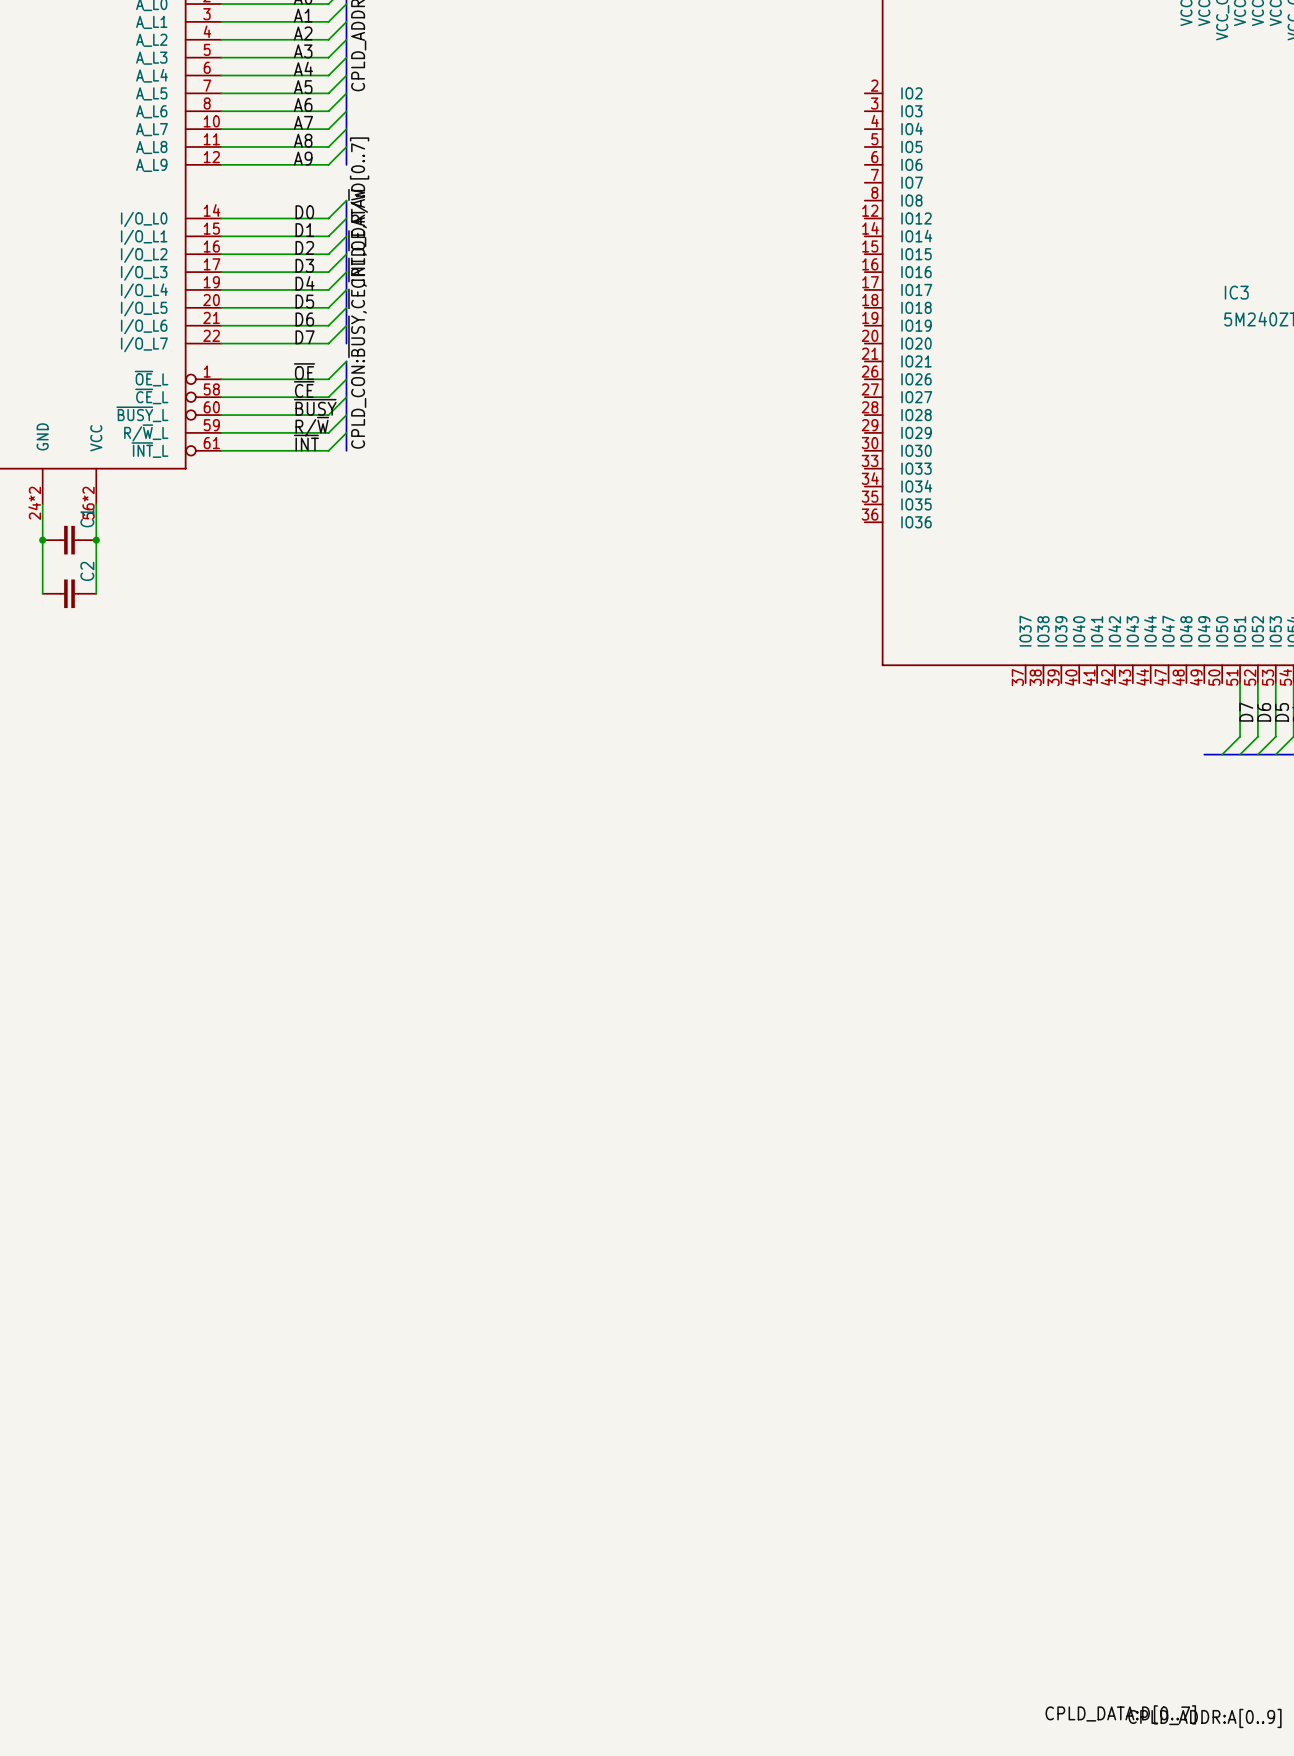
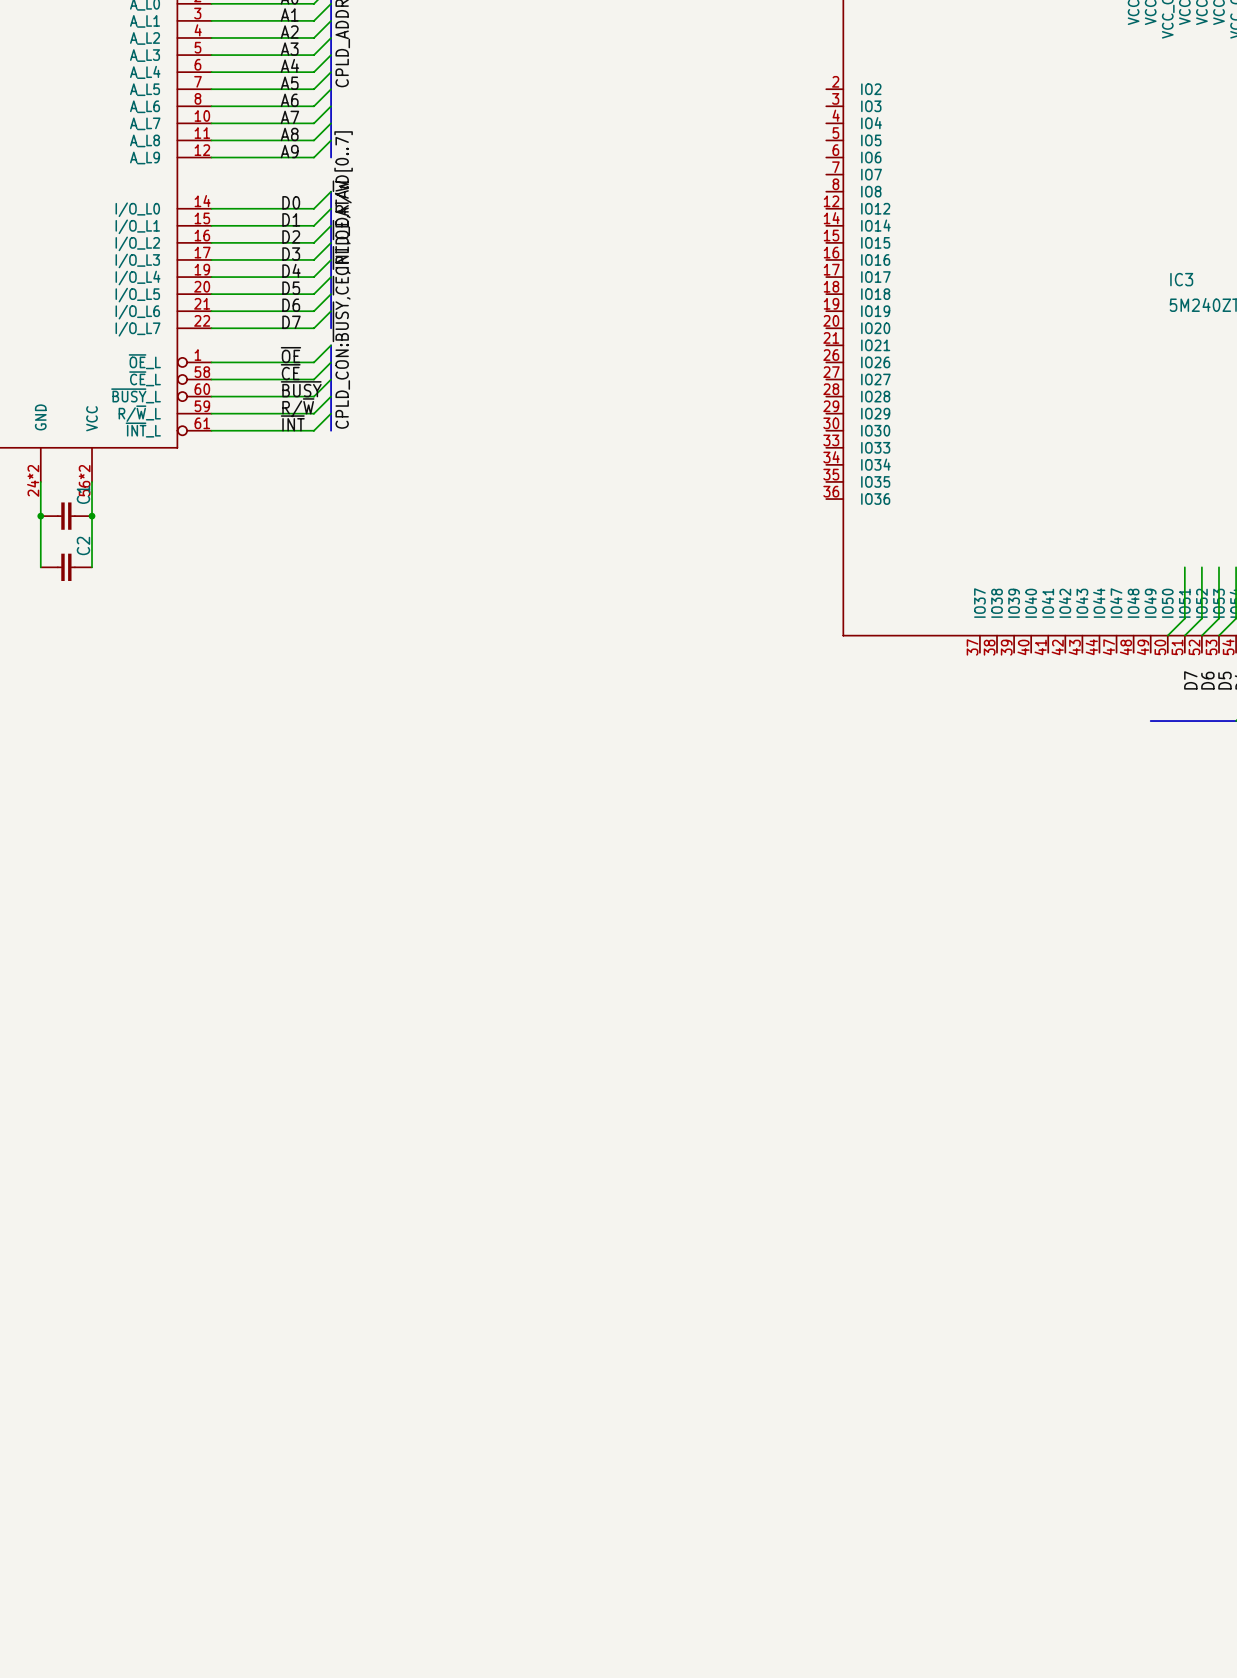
wire: (1240, 683) (1240, 736) (1222, 754) -> (1184, 567) (1184, 618) (1167, 635)
wire: (1257, 683) (1257, 736) (1240, 754) -> (1201, 567) (1201, 618) (1184, 635)
wire: (1275, 683) (1275, 736) (1257, 754) -> (1218, 567) (1218, 618) (1201, 635)
wire: (1293, 683) (1293, 736) (1275, 754) -> (1236, 567) (1236, 618) (1218, 635)
label: CPLD_DATA:D[0..7] (1120, 1714) -> none
label: CPLD_ADDR:A[0..9] (1204, 1718) -> none

